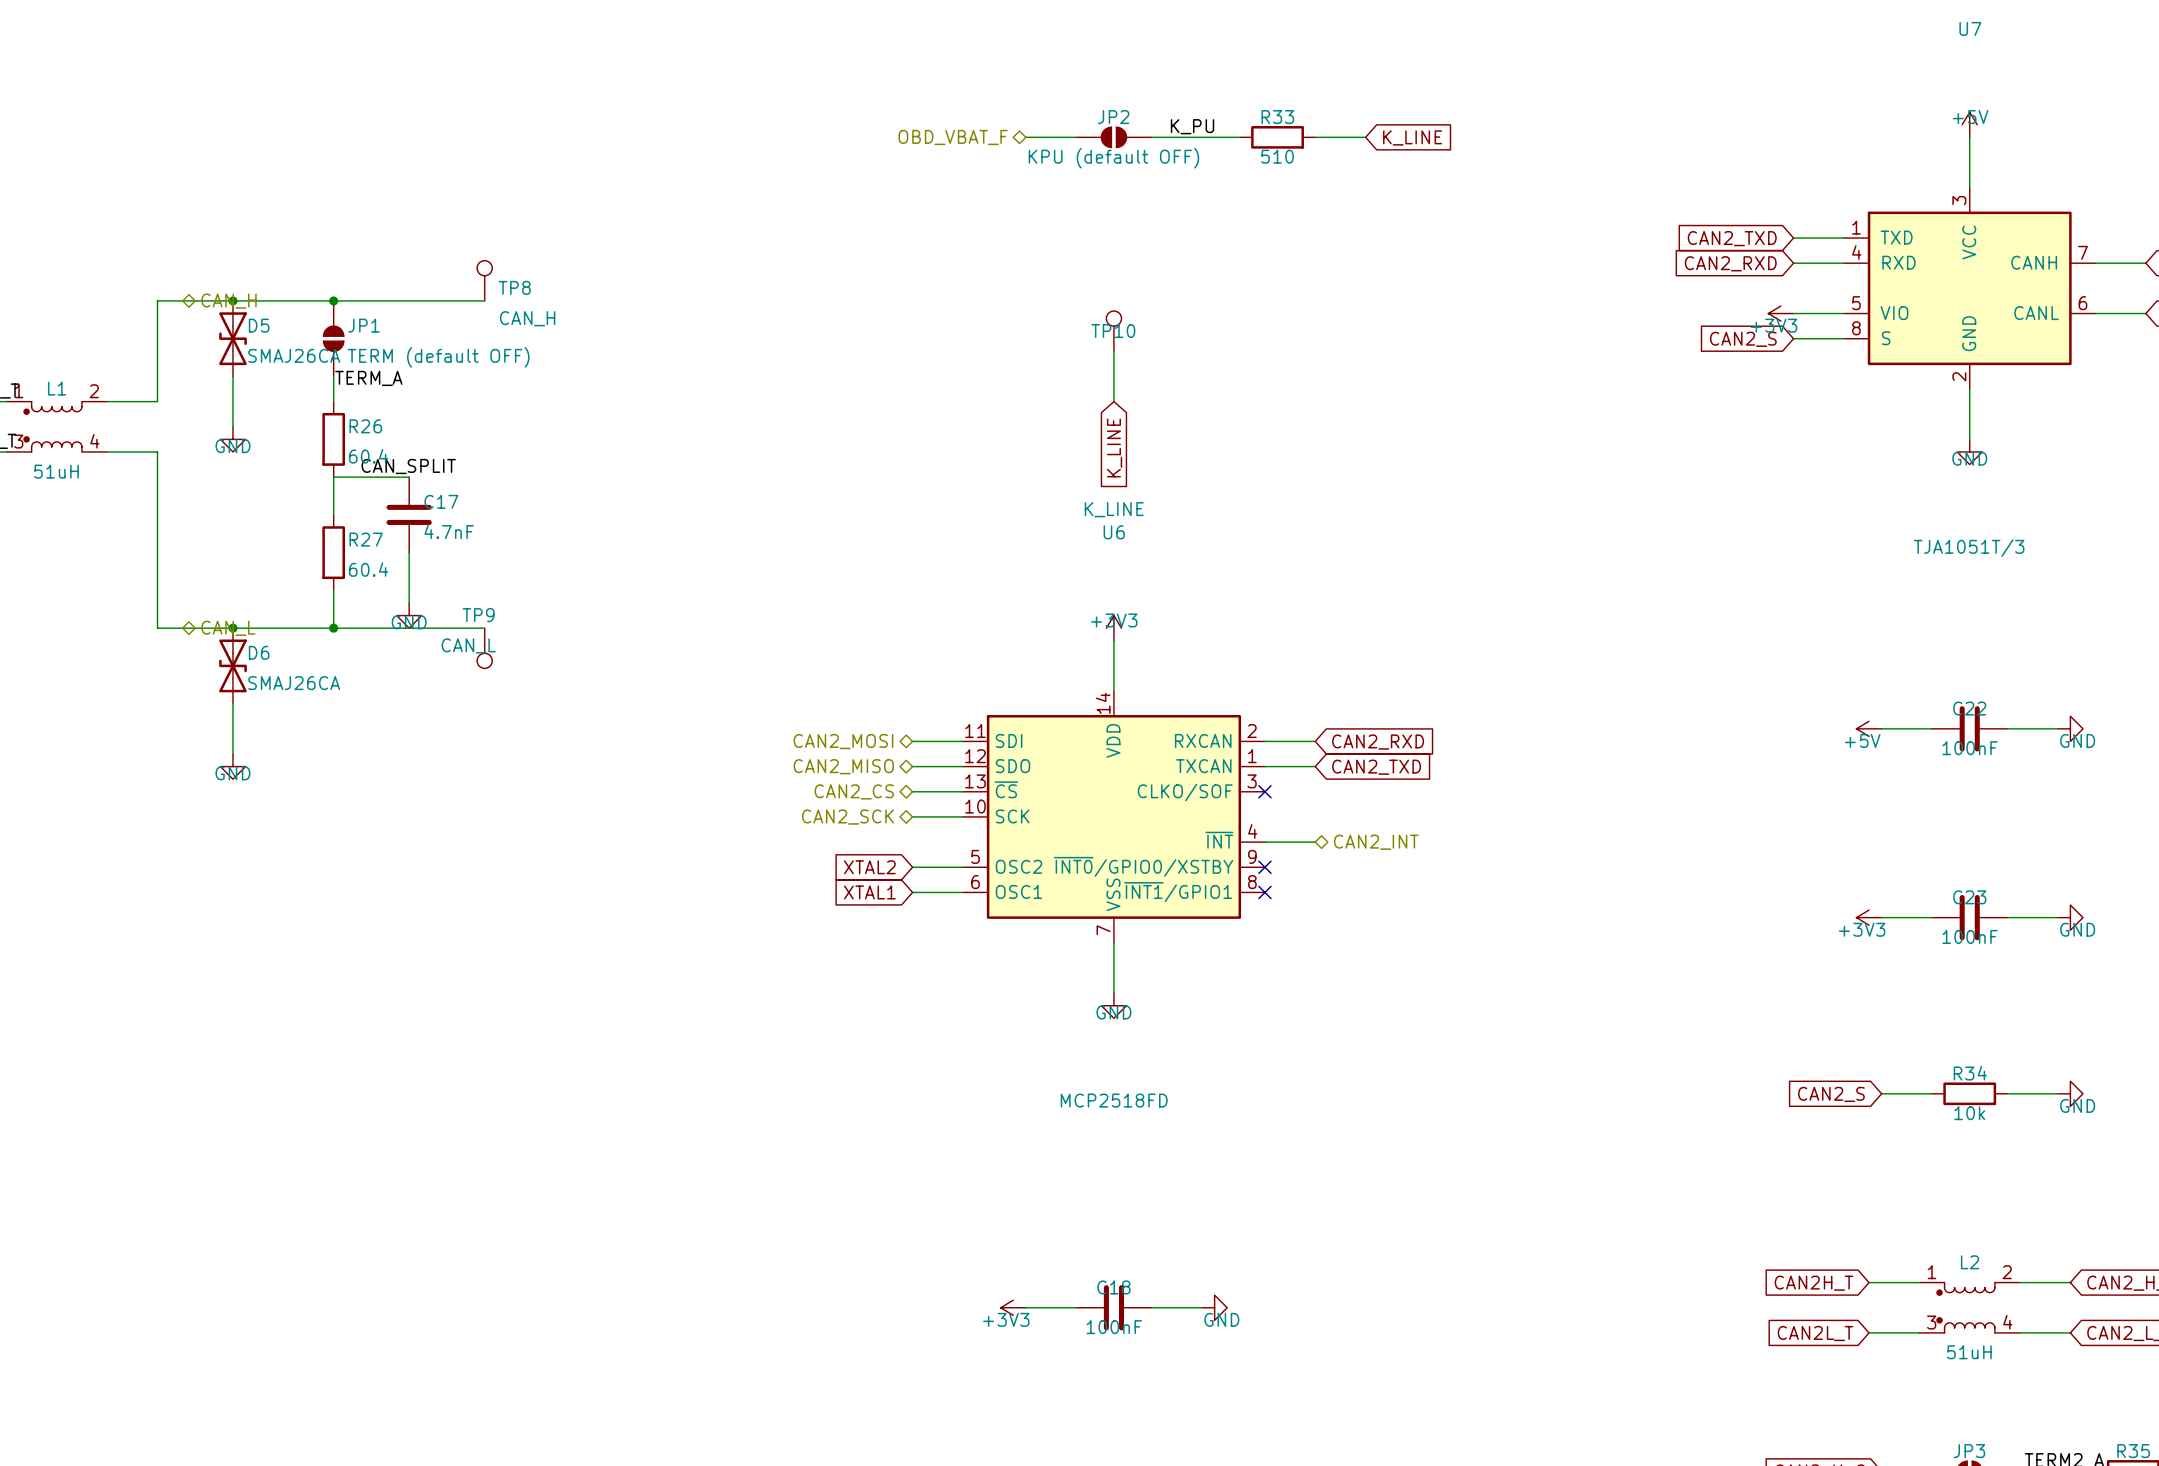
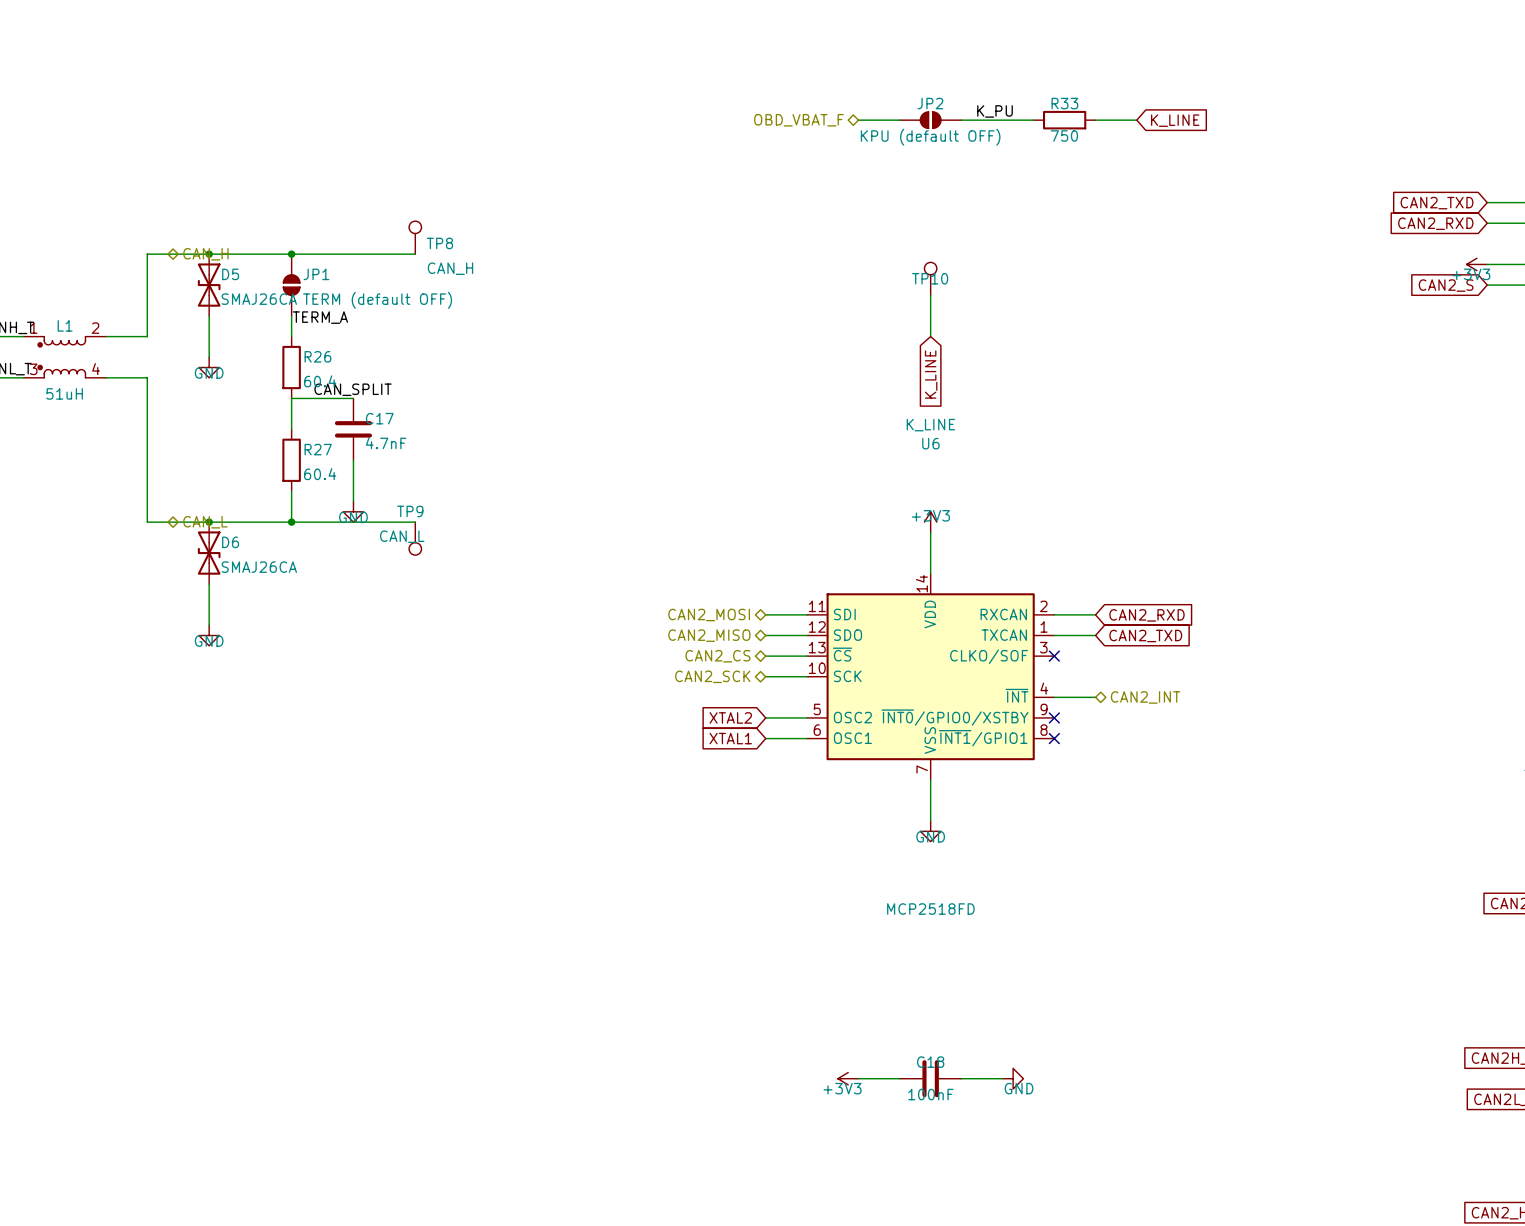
R33 value: 510 (1277, 156) -> 750 (1064, 136)

